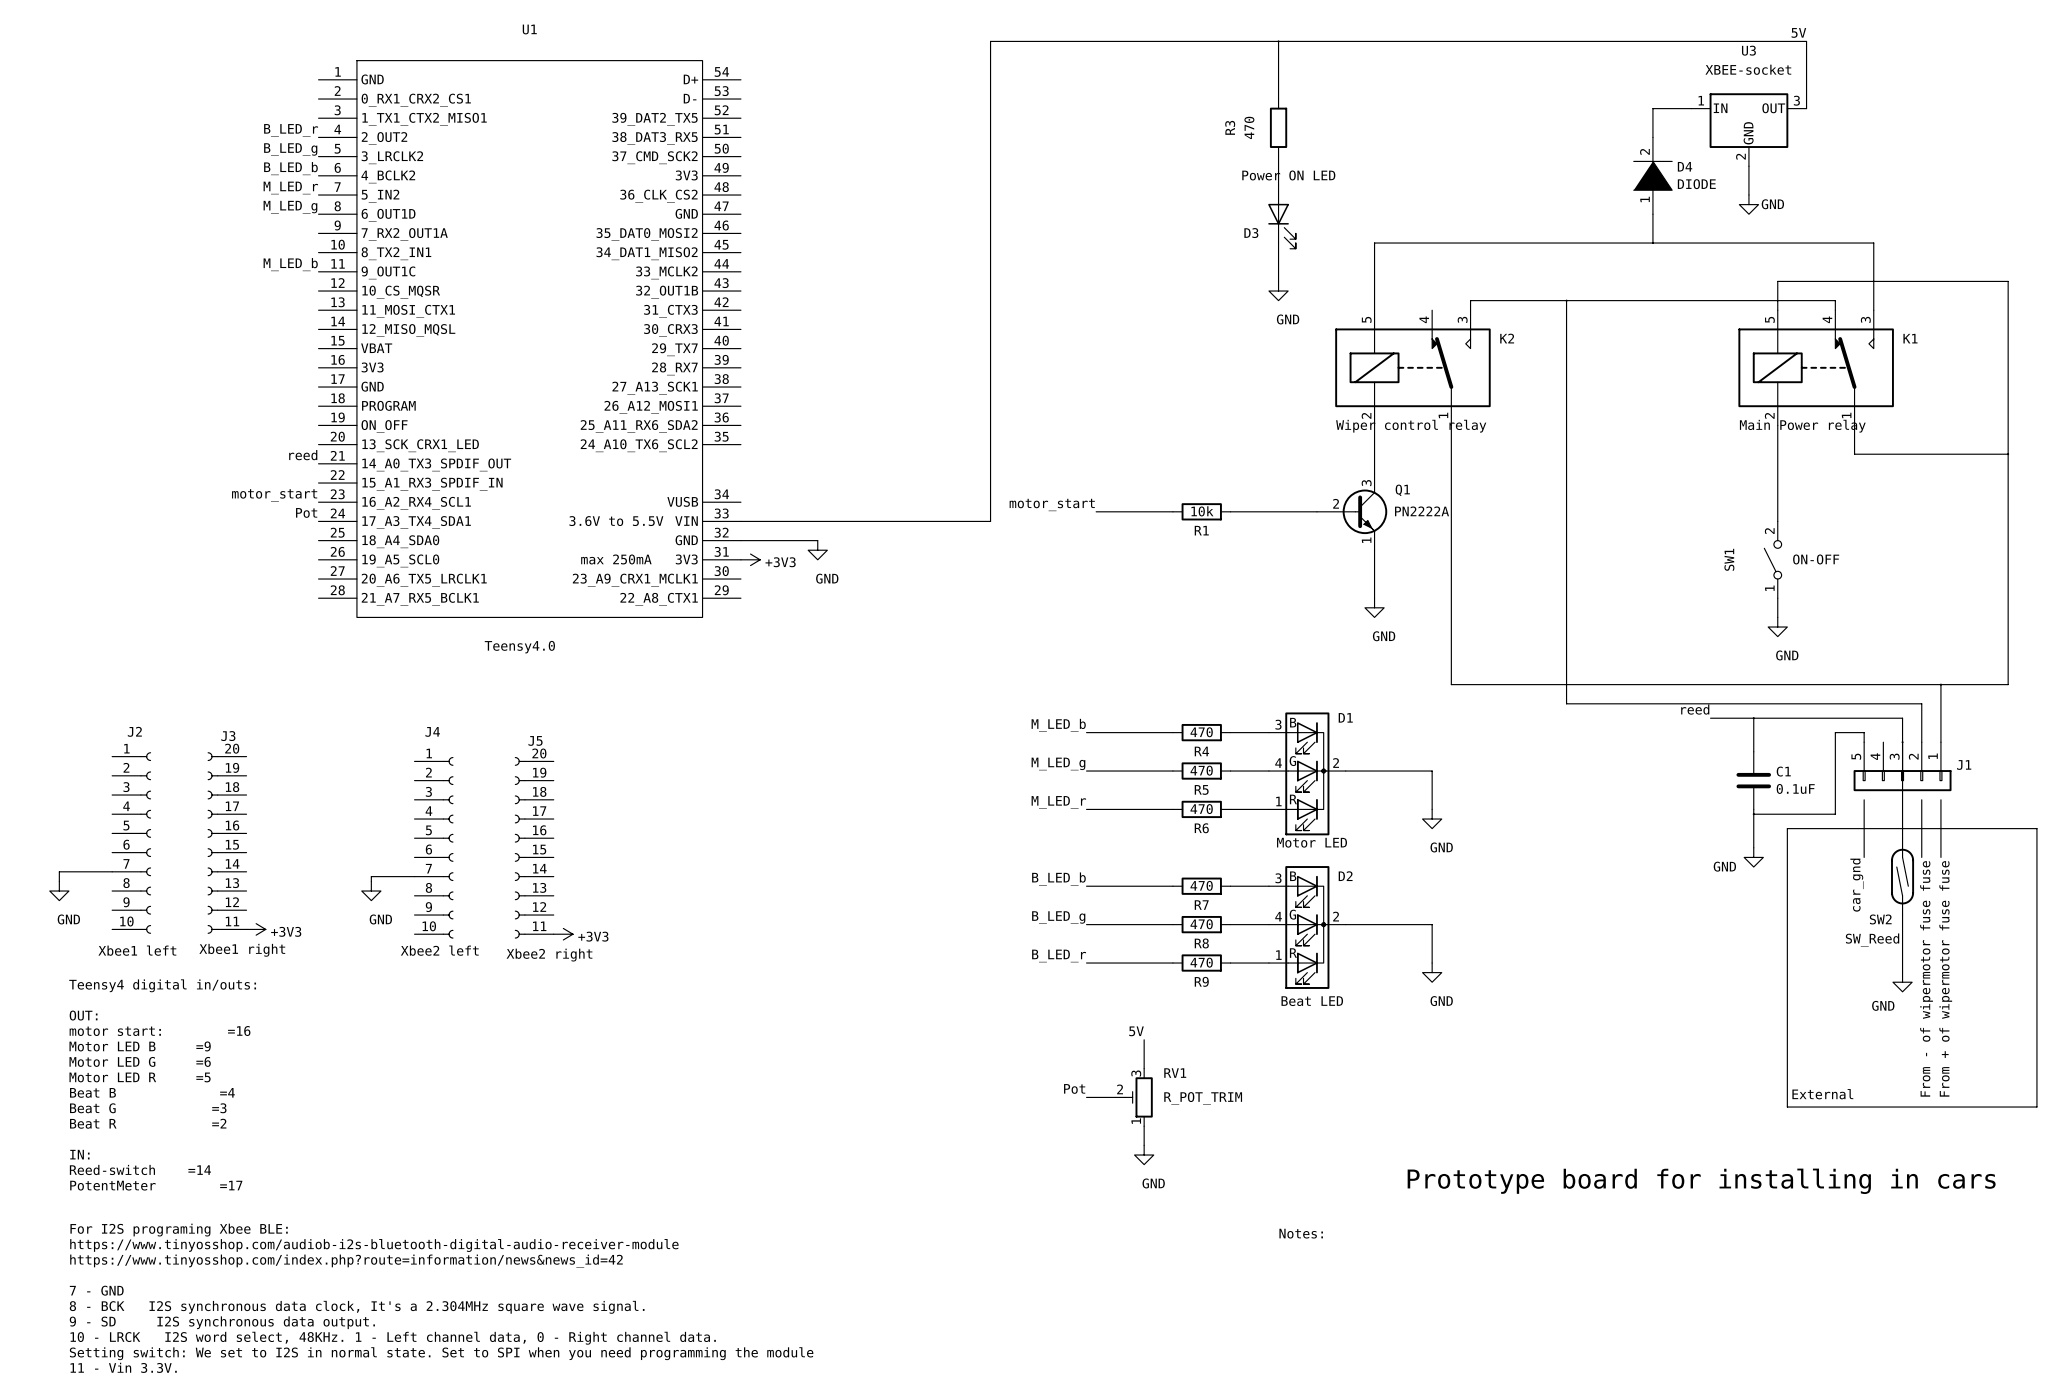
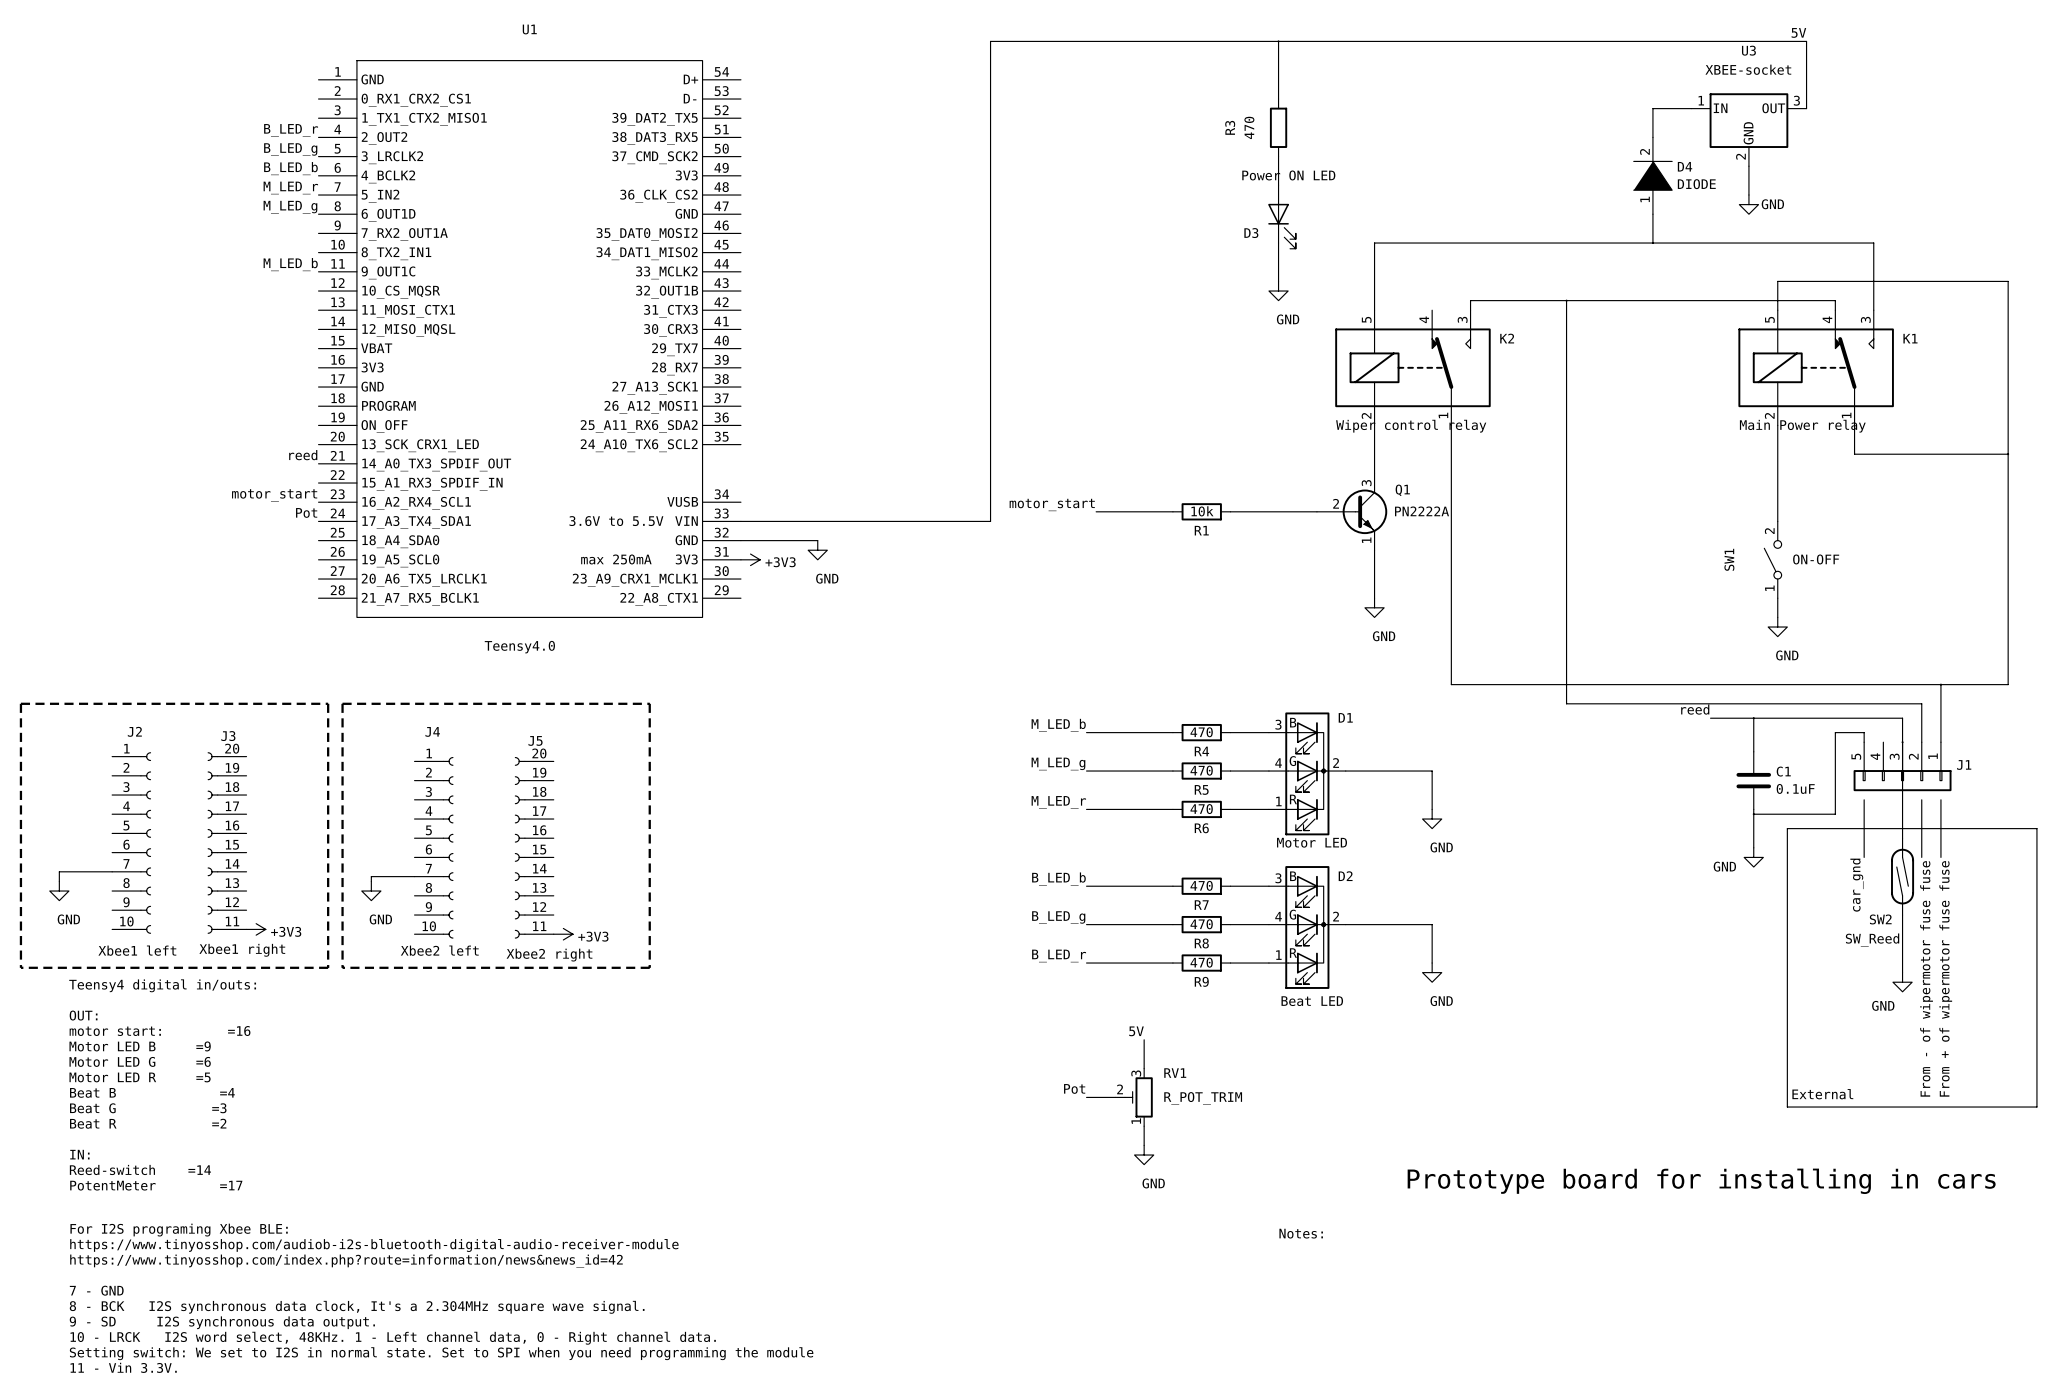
line: none -> (20, 703) (20, 967) (328, 967) (328, 703) (20, 703)
line: none -> (342, 703) (649, 703) (649, 967) (342, 967) (342, 703)

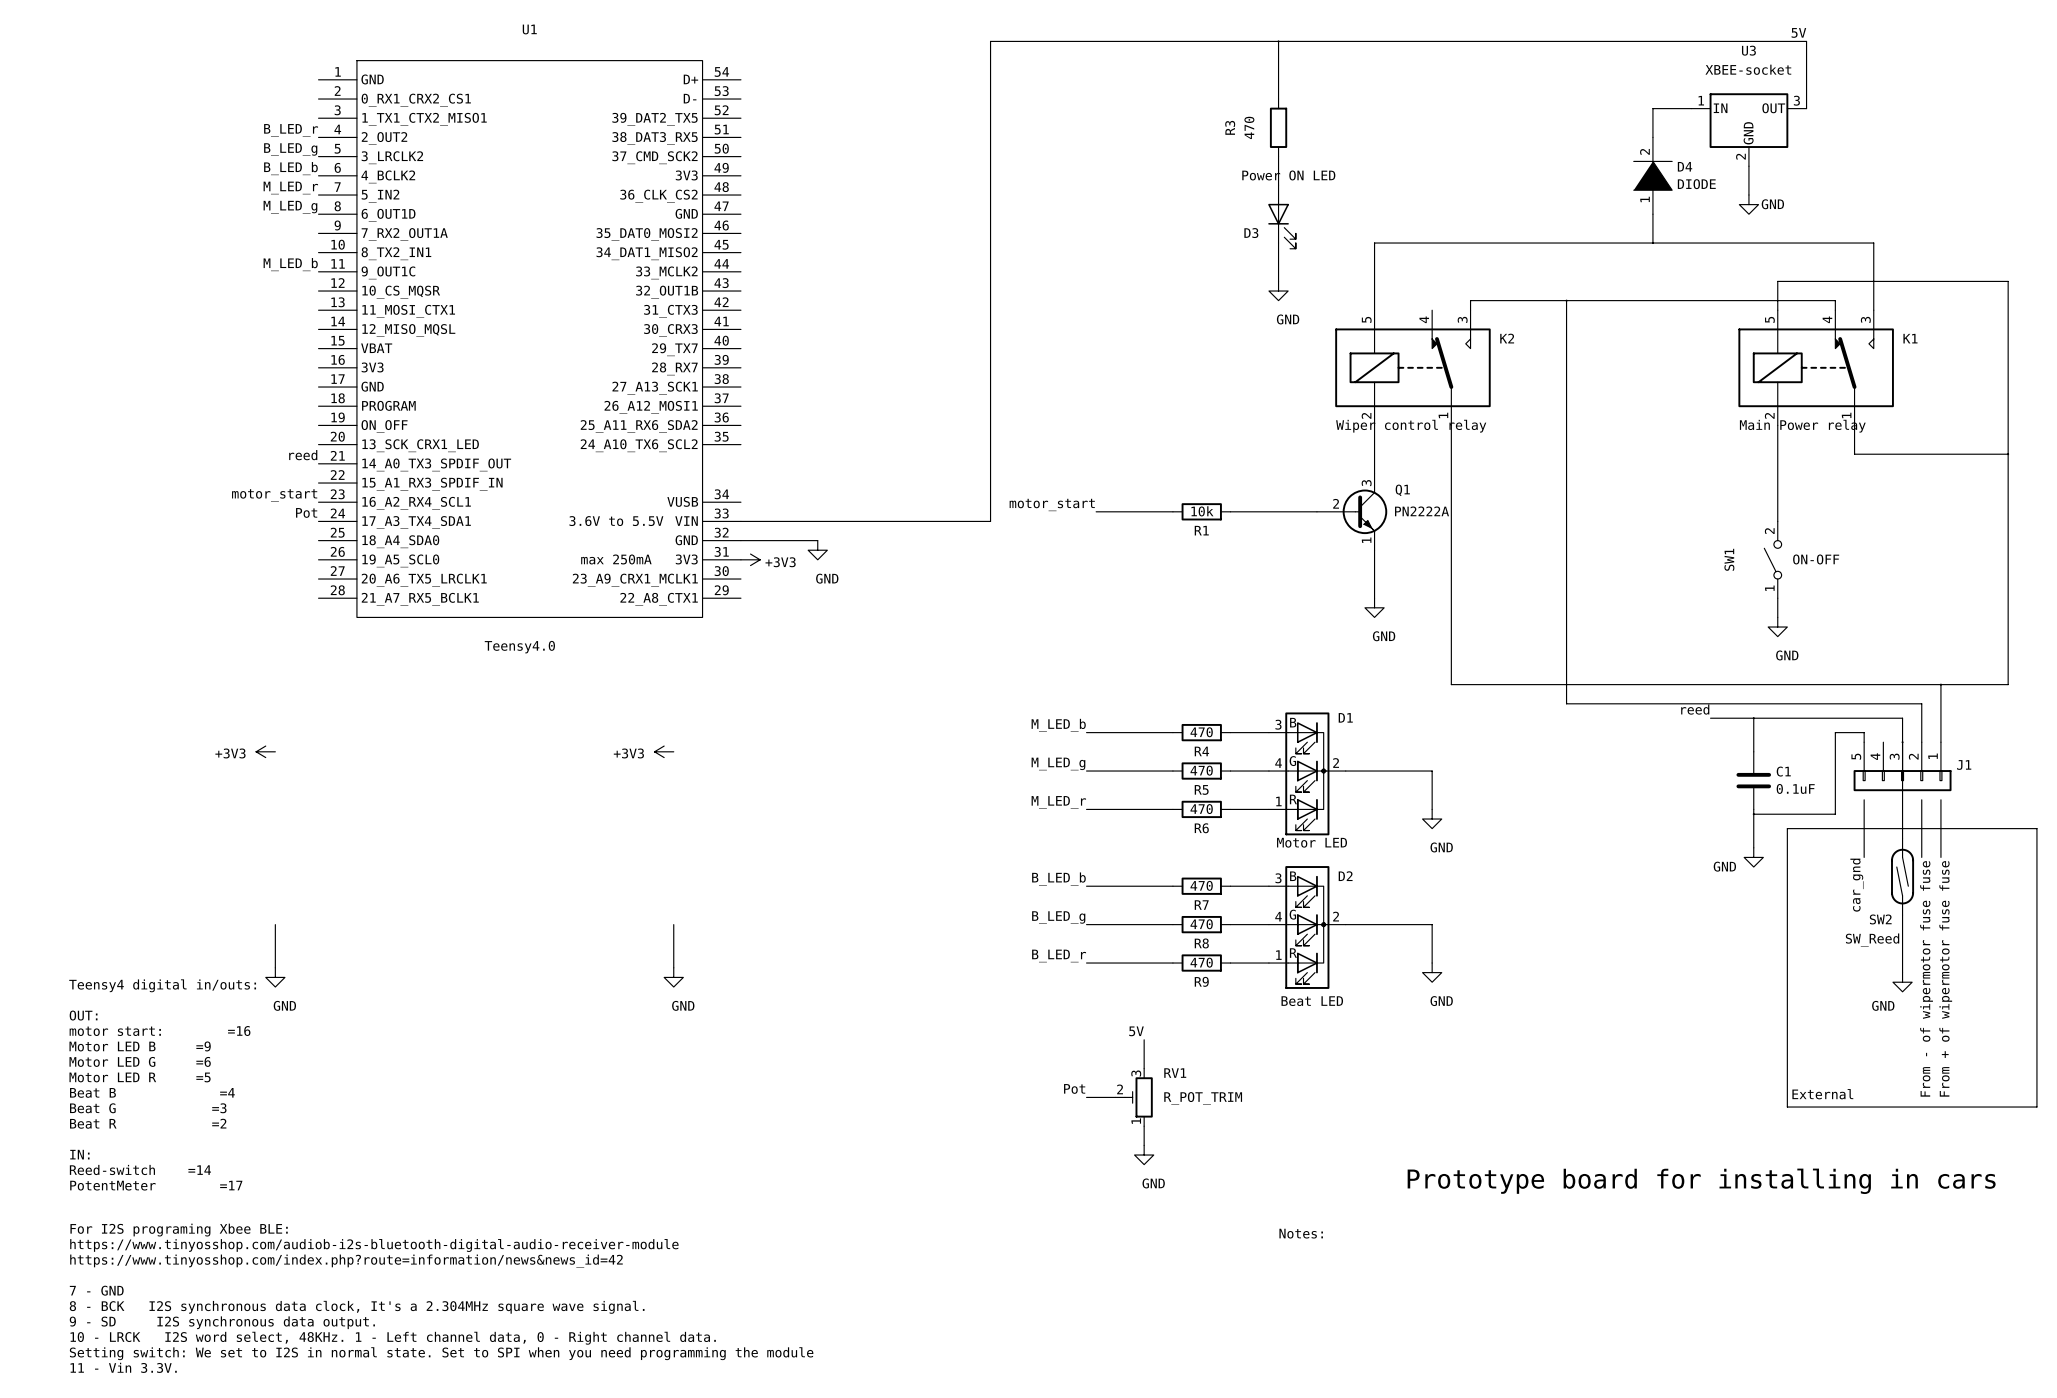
line: (20, 703) (20, 967) (328, 967) (328, 703) (20, 703) -> none
line: (342, 703) (649, 703) (649, 967) (342, 967) (342, 703) -> none
power symbol: none -> +3V3 (265, 751)
power symbol: none -> +3V3 (664, 751)
J2: Xbee1 left (131, 843) -> none
J3: Xbee1 right (227, 843) -> none
J4: Xbee2 left (434, 847) -> none
J5: Xbee2 right (534, 847) -> none
wire: (112, 871) (59, 871) (59, 881) -> none
wire: (414, 876) (371, 876) (371, 881) -> none
power symbol: GND (59, 891) -> none
power symbol: GND (371, 891) -> none
wire: none -> (275, 924) (275, 967)
wire: none -> (673, 924) (673, 967)
power symbol: +3V3 (256, 929) -> none
power symbol: +3V3 (563, 934) -> none
power symbol: none -> GND (275, 977)
power symbol: none -> GND (673, 977)

